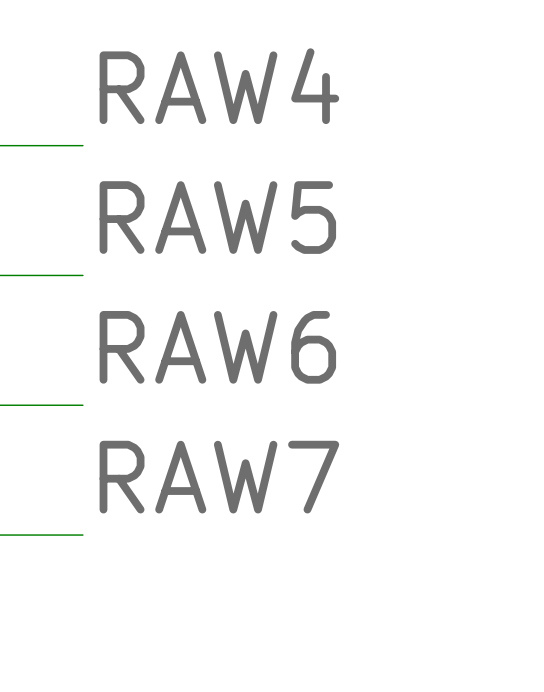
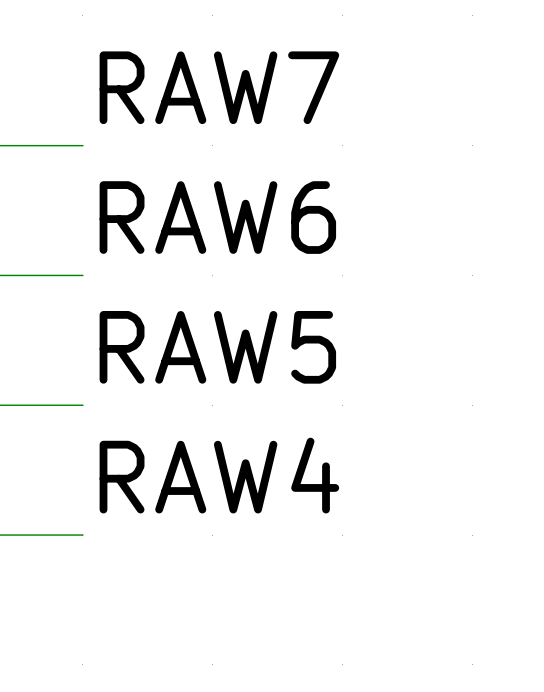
label: RAW4 (219, 86) -> RAW7 (219, 87)
label: RAW5 (217, 217) -> RAW6 (217, 217)
label: RAW6 (217, 347) -> RAW5 (217, 347)
label: RAW7 (219, 477) -> RAW4 (219, 475)

